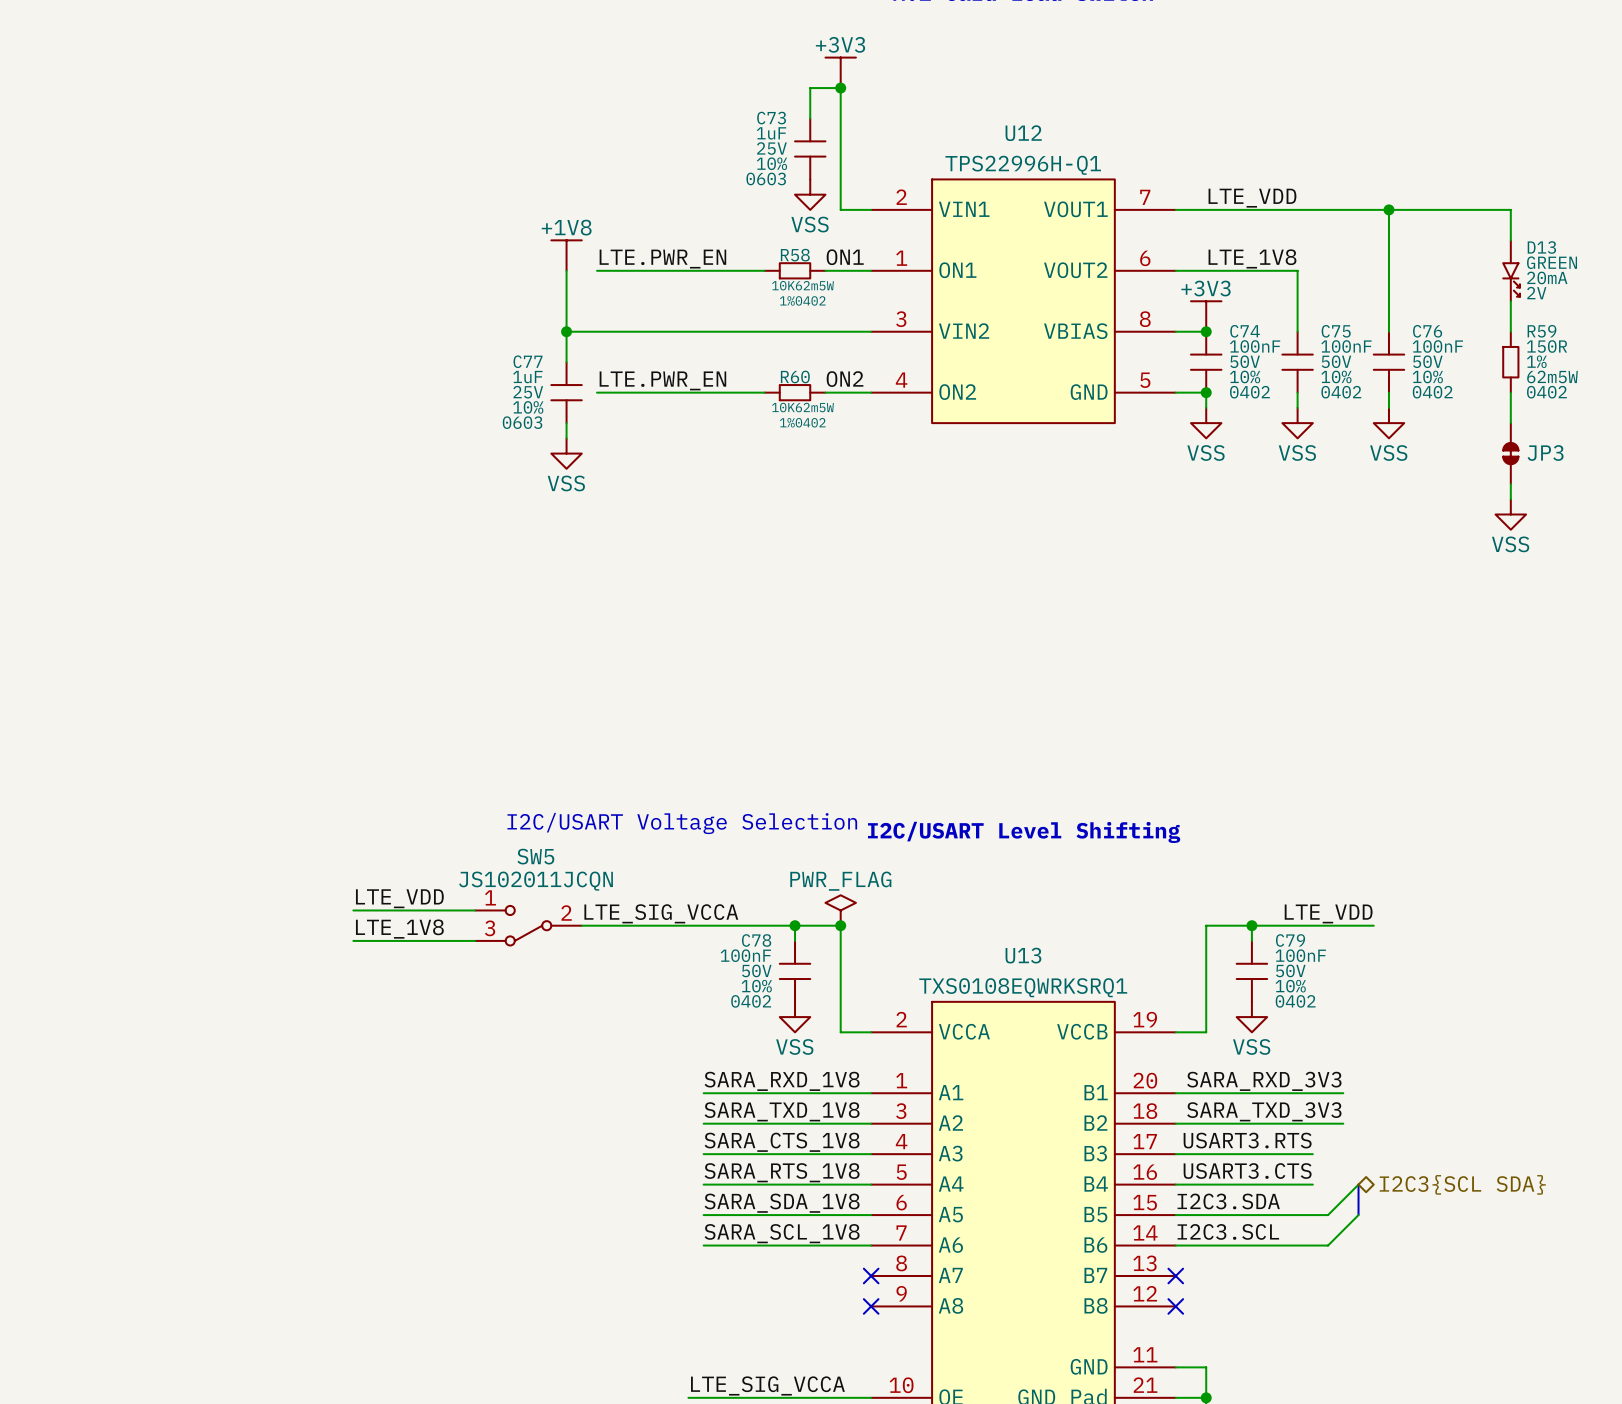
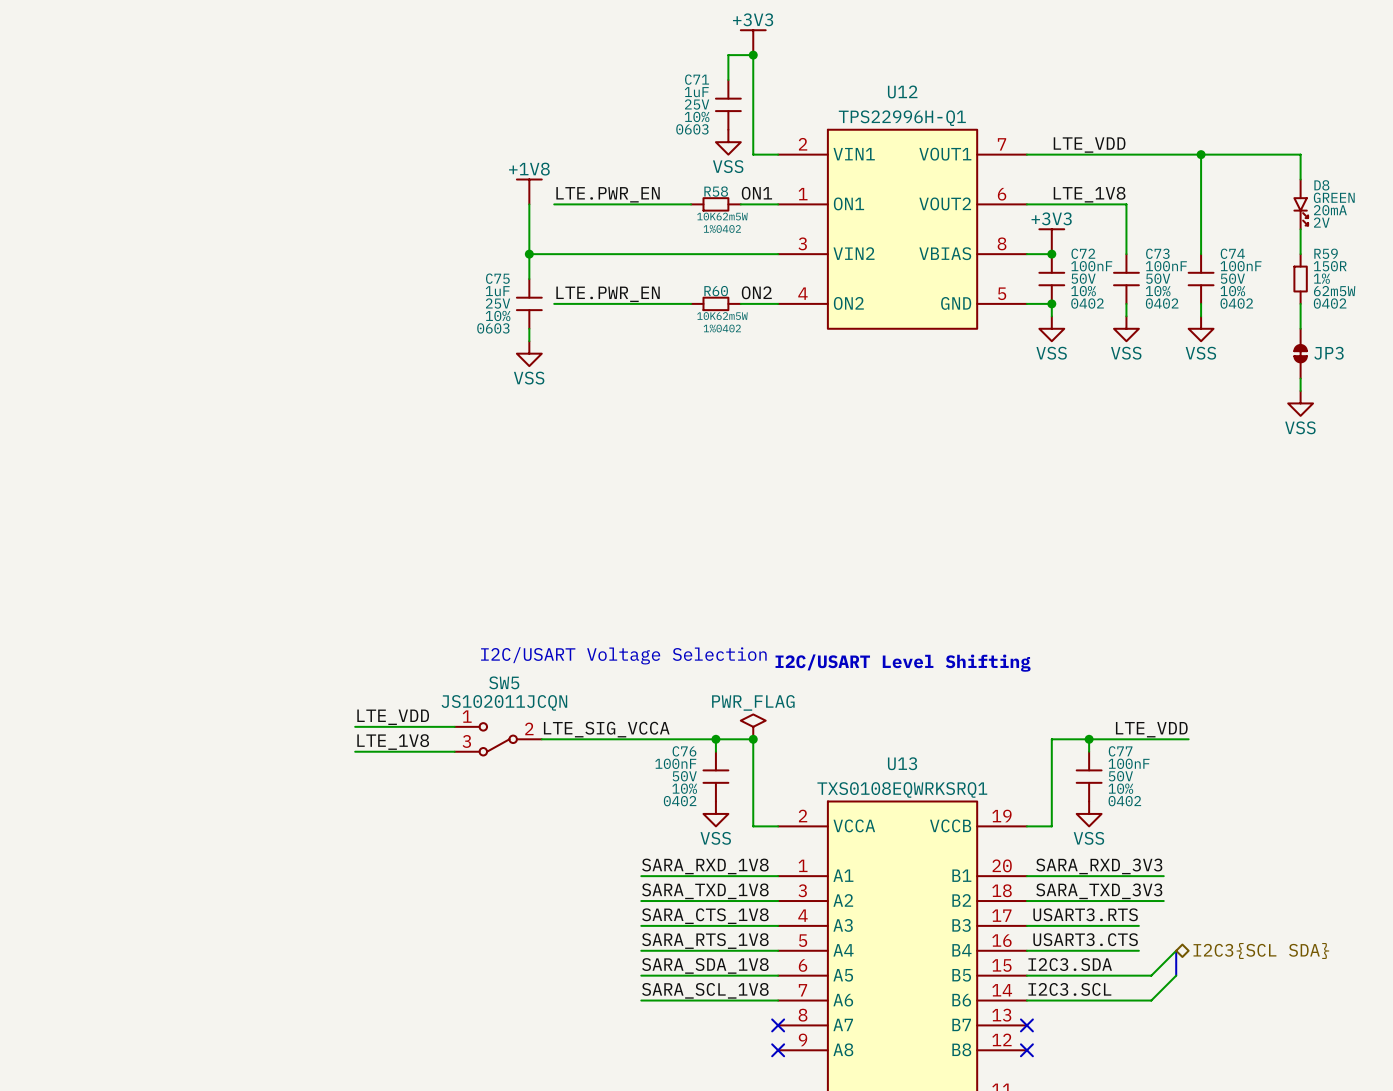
C73 name: C73 (771, 118) -> C71 (697, 79)
D13 name: D13 (1541, 247) -> D8 (1321, 185)
C74 name: C74 (1245, 331) -> C72 (1083, 253)
C75 name: C75 (1336, 331) -> C73 (1157, 253)
C76 name: C76 (1427, 331) -> C74 (1232, 253)
C77 name: C77 (528, 361) -> C75 (497, 278)
C78 name: C78 (756, 940) -> C76 (684, 751)
C79 name: C79 (1290, 940) -> C77 (1120, 751)

